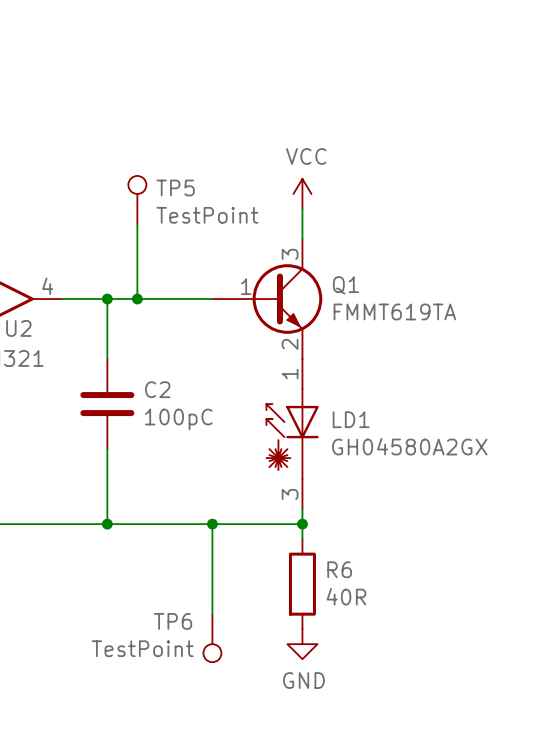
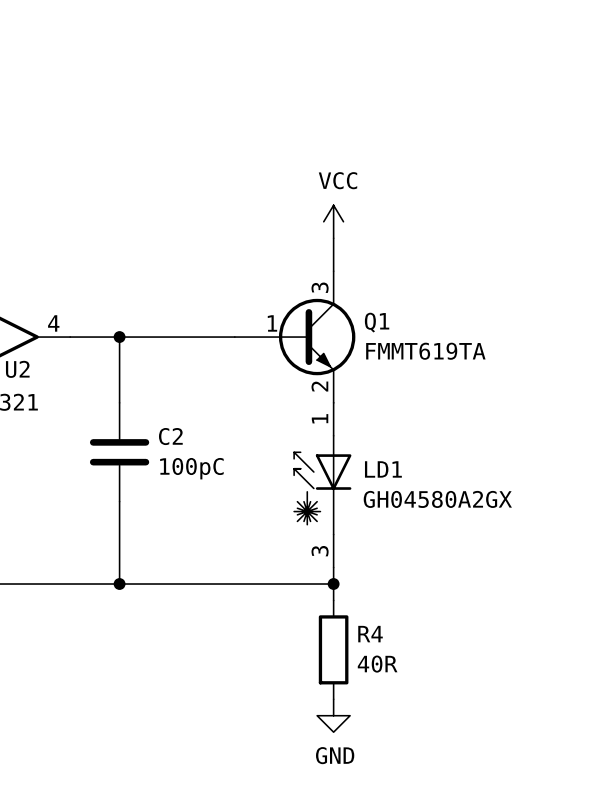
TP5: TestPoint (137, 199) -> none
wire: (137, 223) (137, 299) -> none
junction: (137, 299) -> none
wire: (212, 524) (212, 614) -> none
junction: (212, 524) -> none
R6 name: R6 (339, 569) -> R4 (370, 634)
TP6: TestPoint (212, 638) -> none

